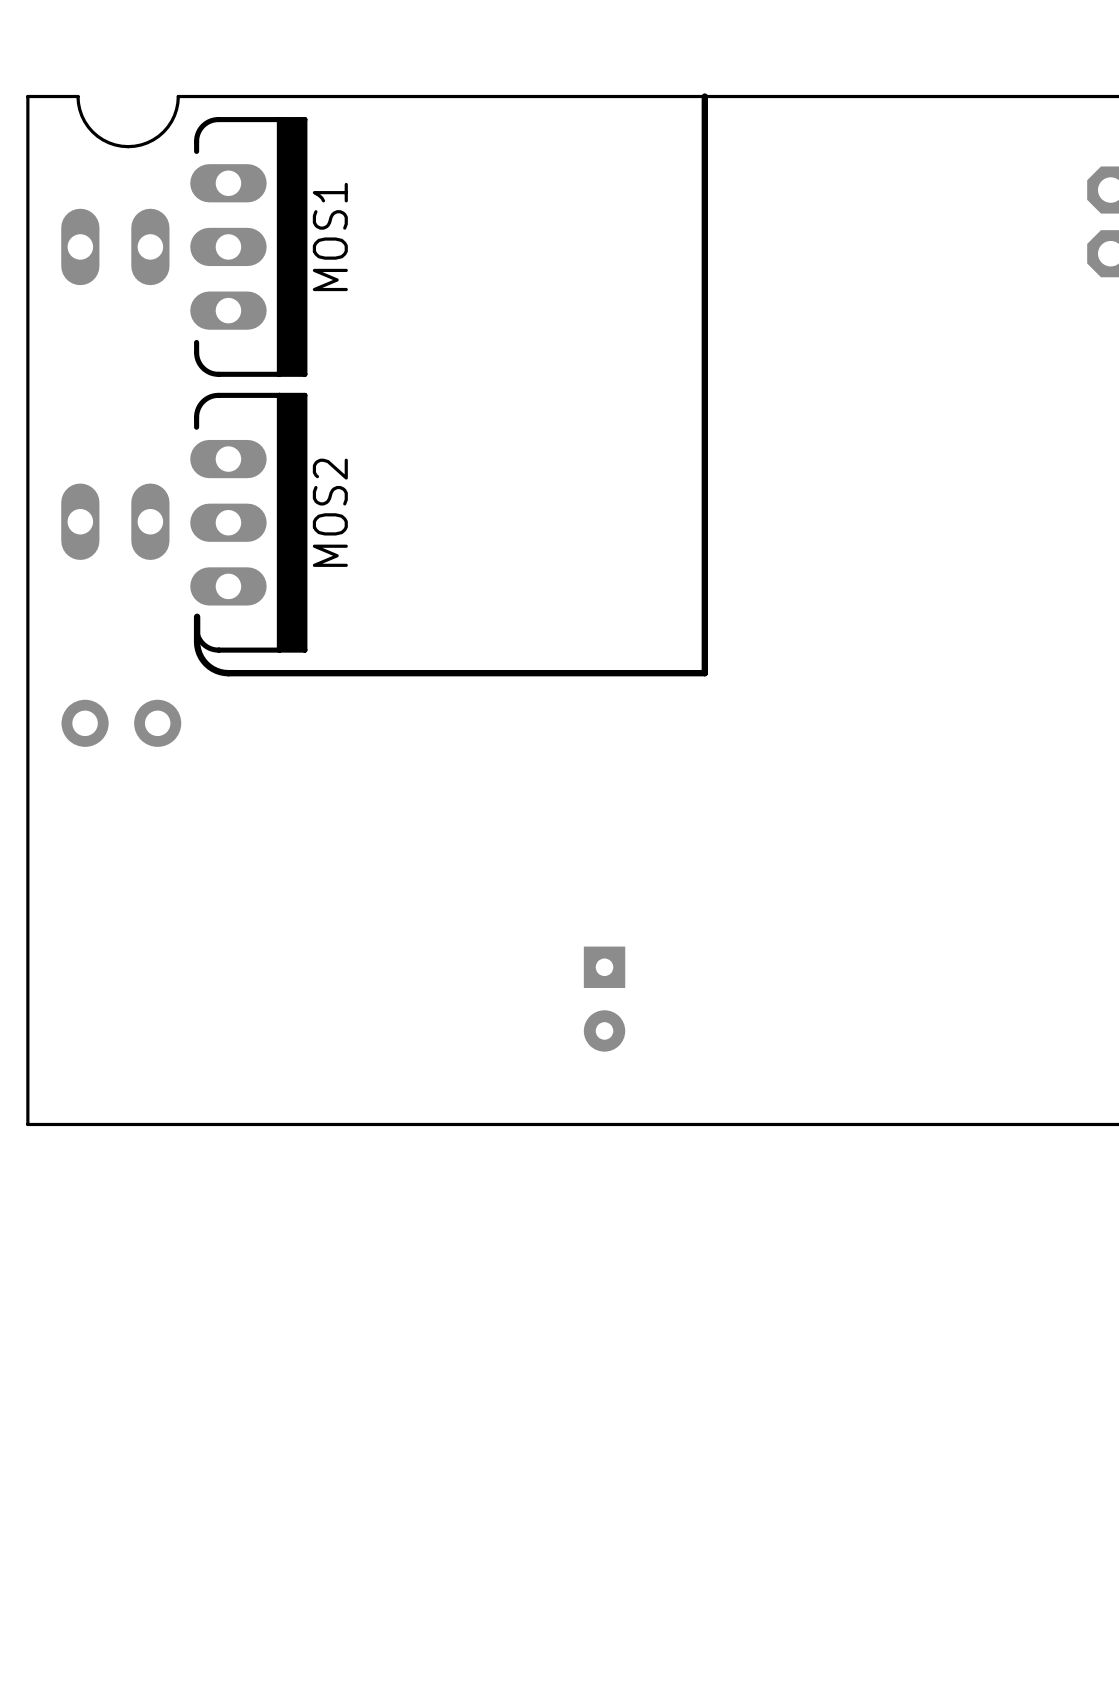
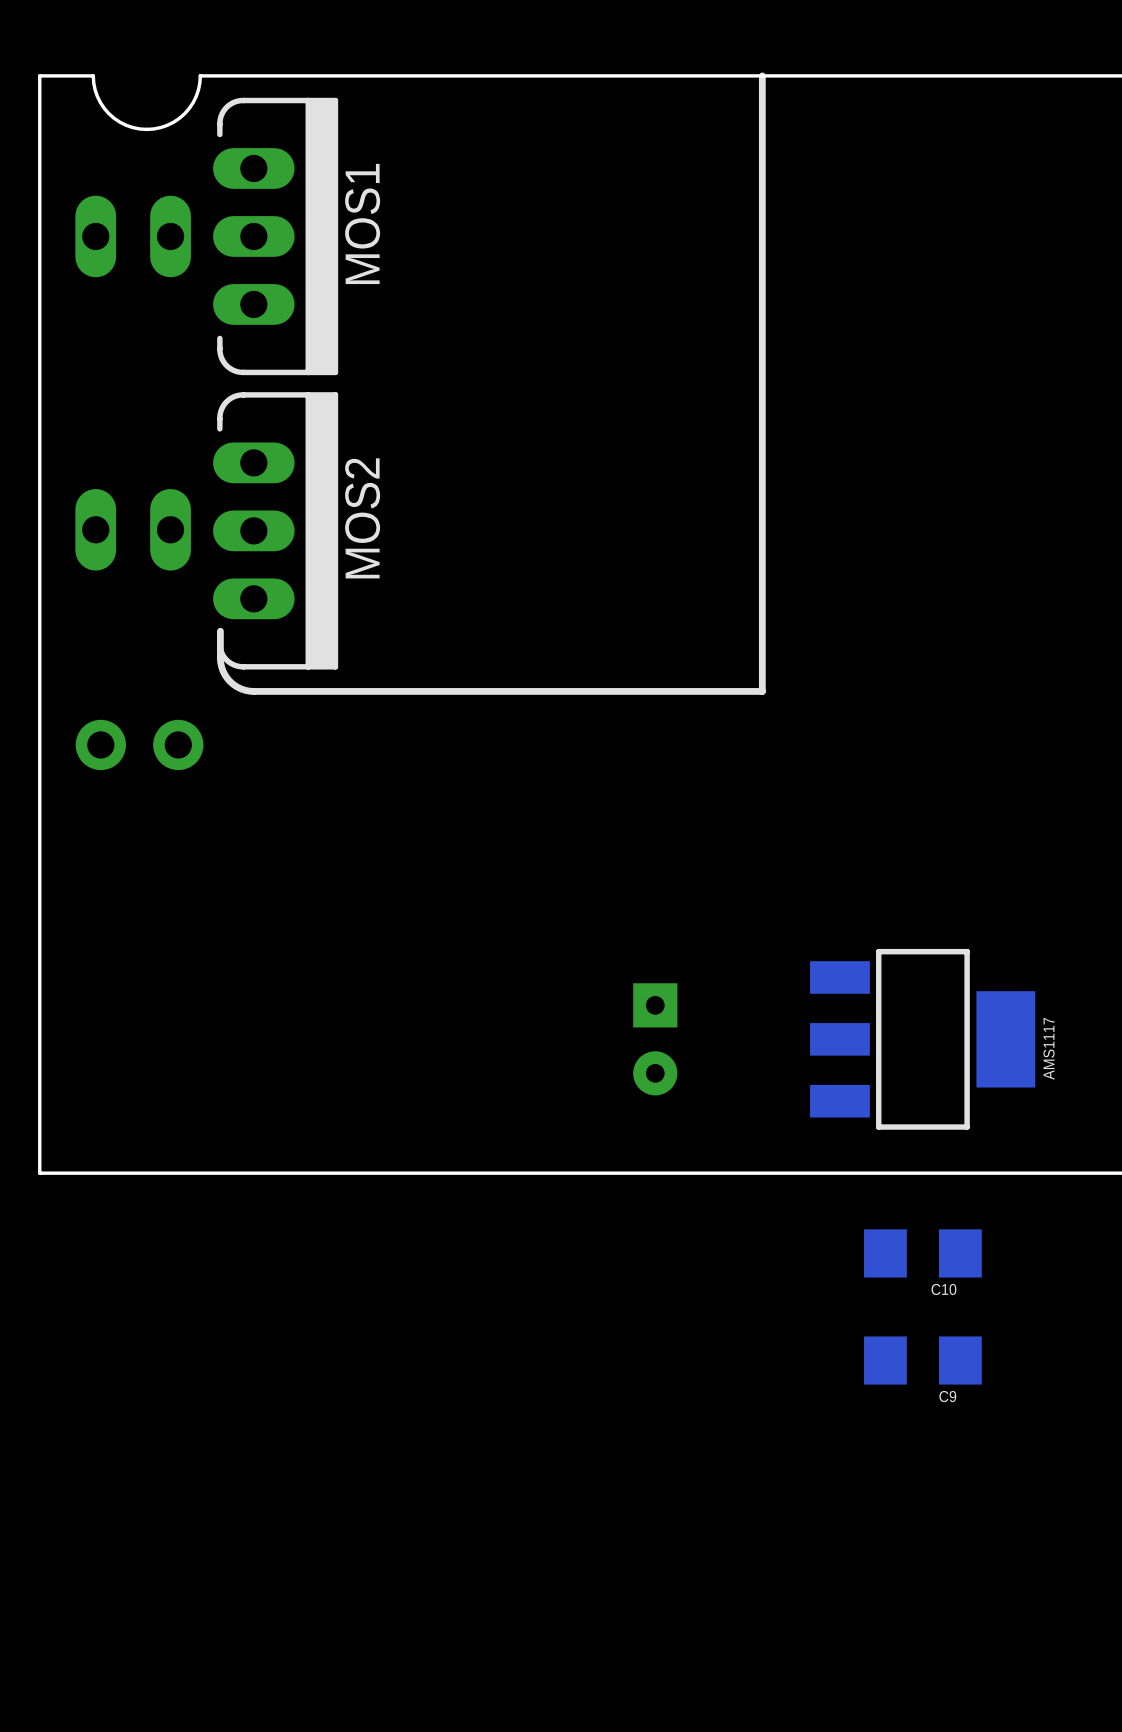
AMS1117: none -> (922, 1039)
C10: none -> (922, 1253)
C9: none -> (922, 1360)

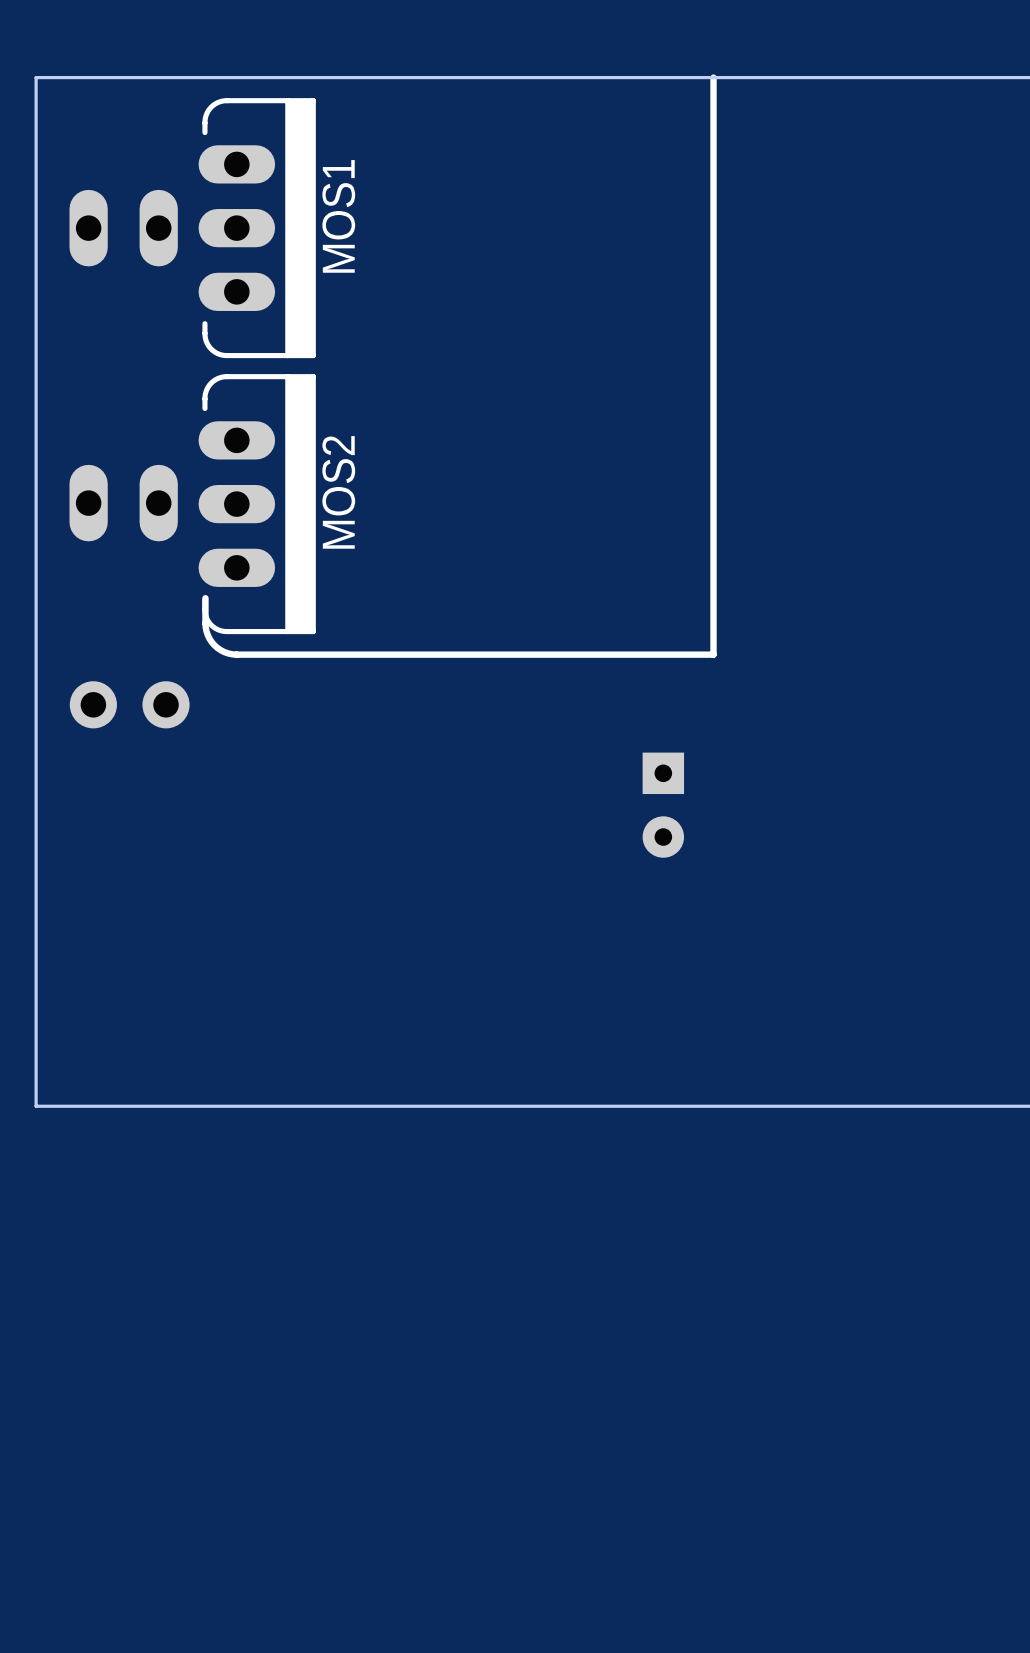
board edge: (200, 75) (196, 96) (184, 113) (167, 125) (146, 129) (126, 125) (108, 113) (97, 96) (93, 75) -> (186, 77) (86, 77)
part position: (655, 1039) -> (663, 805)
AMS1117: (922, 1039) -> none
C10: (922, 1253) -> none
C9: (922, 1360) -> none

